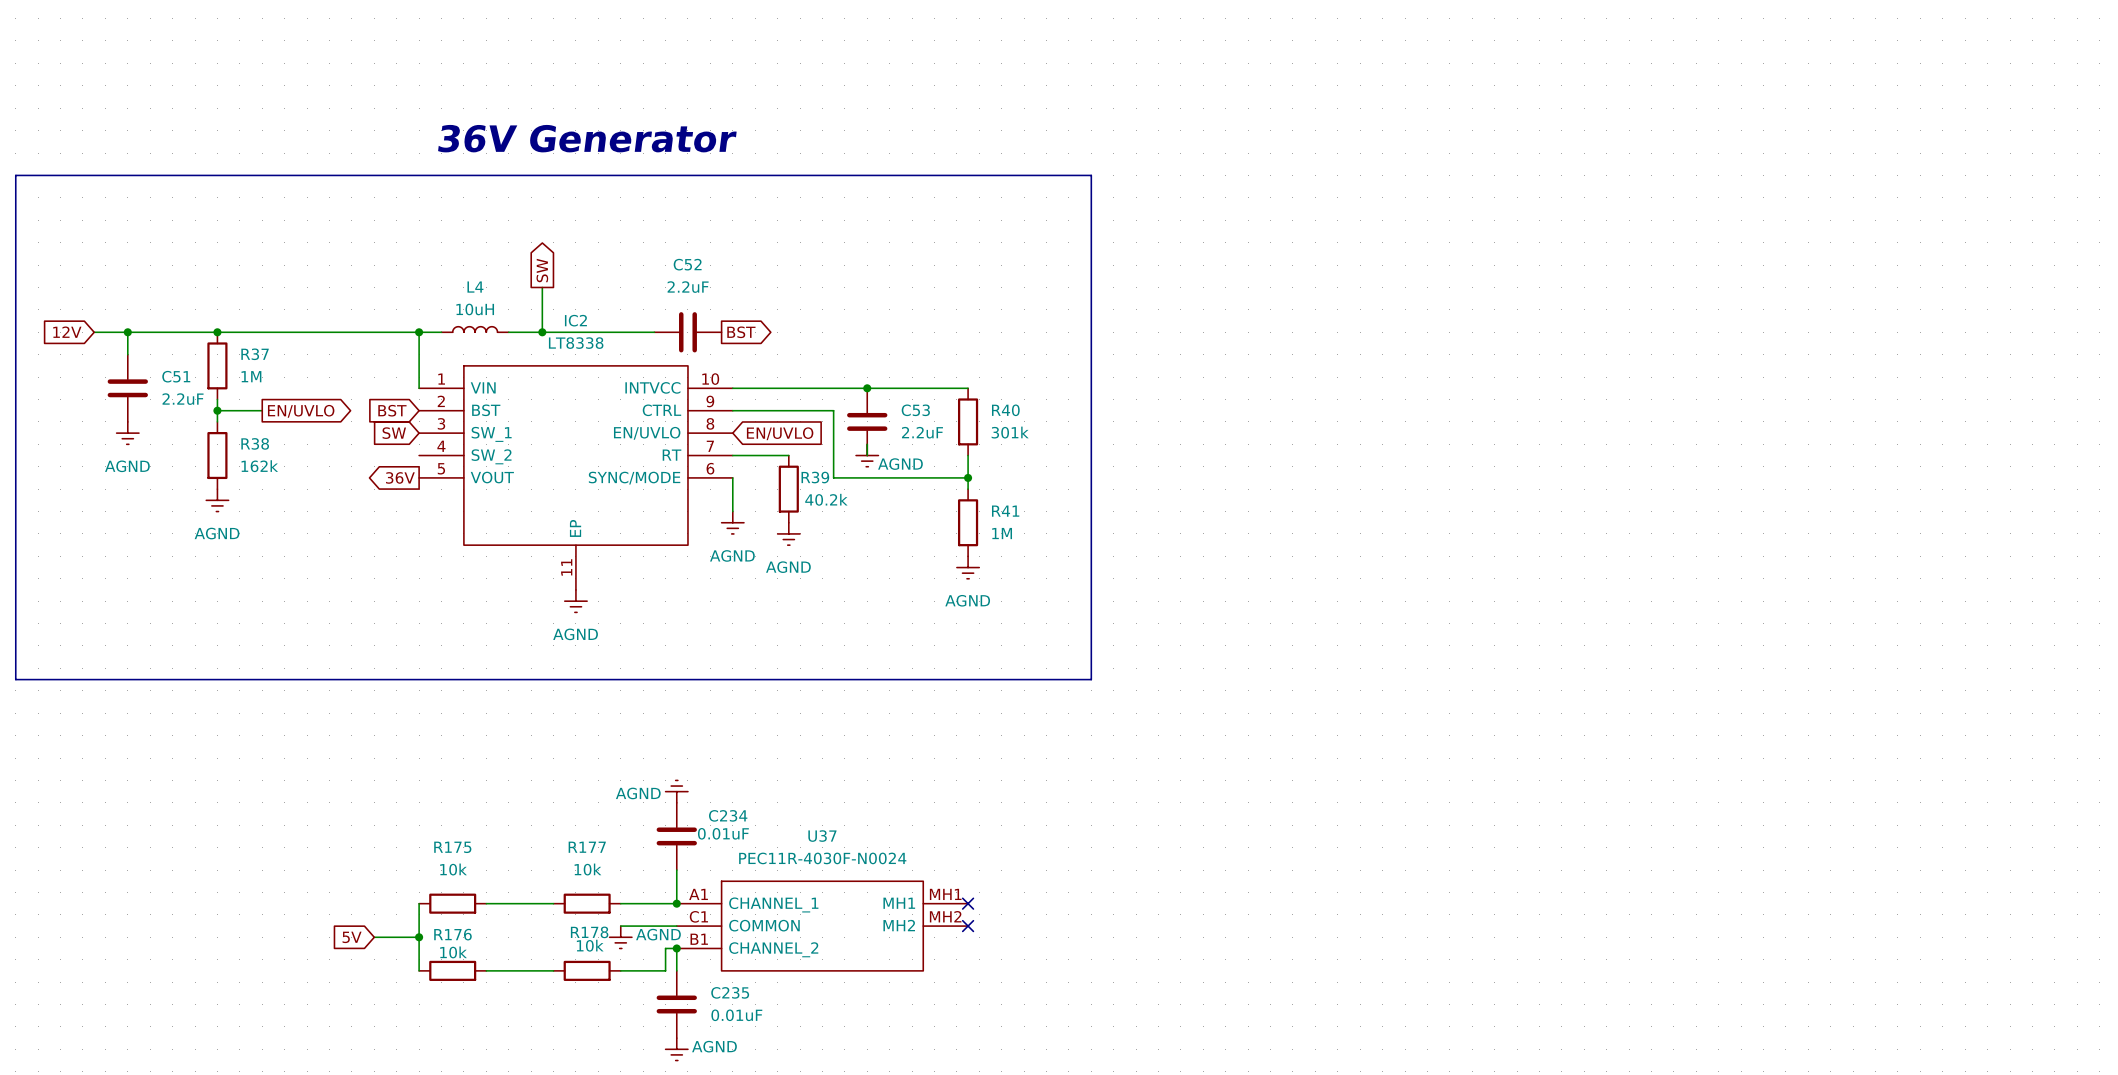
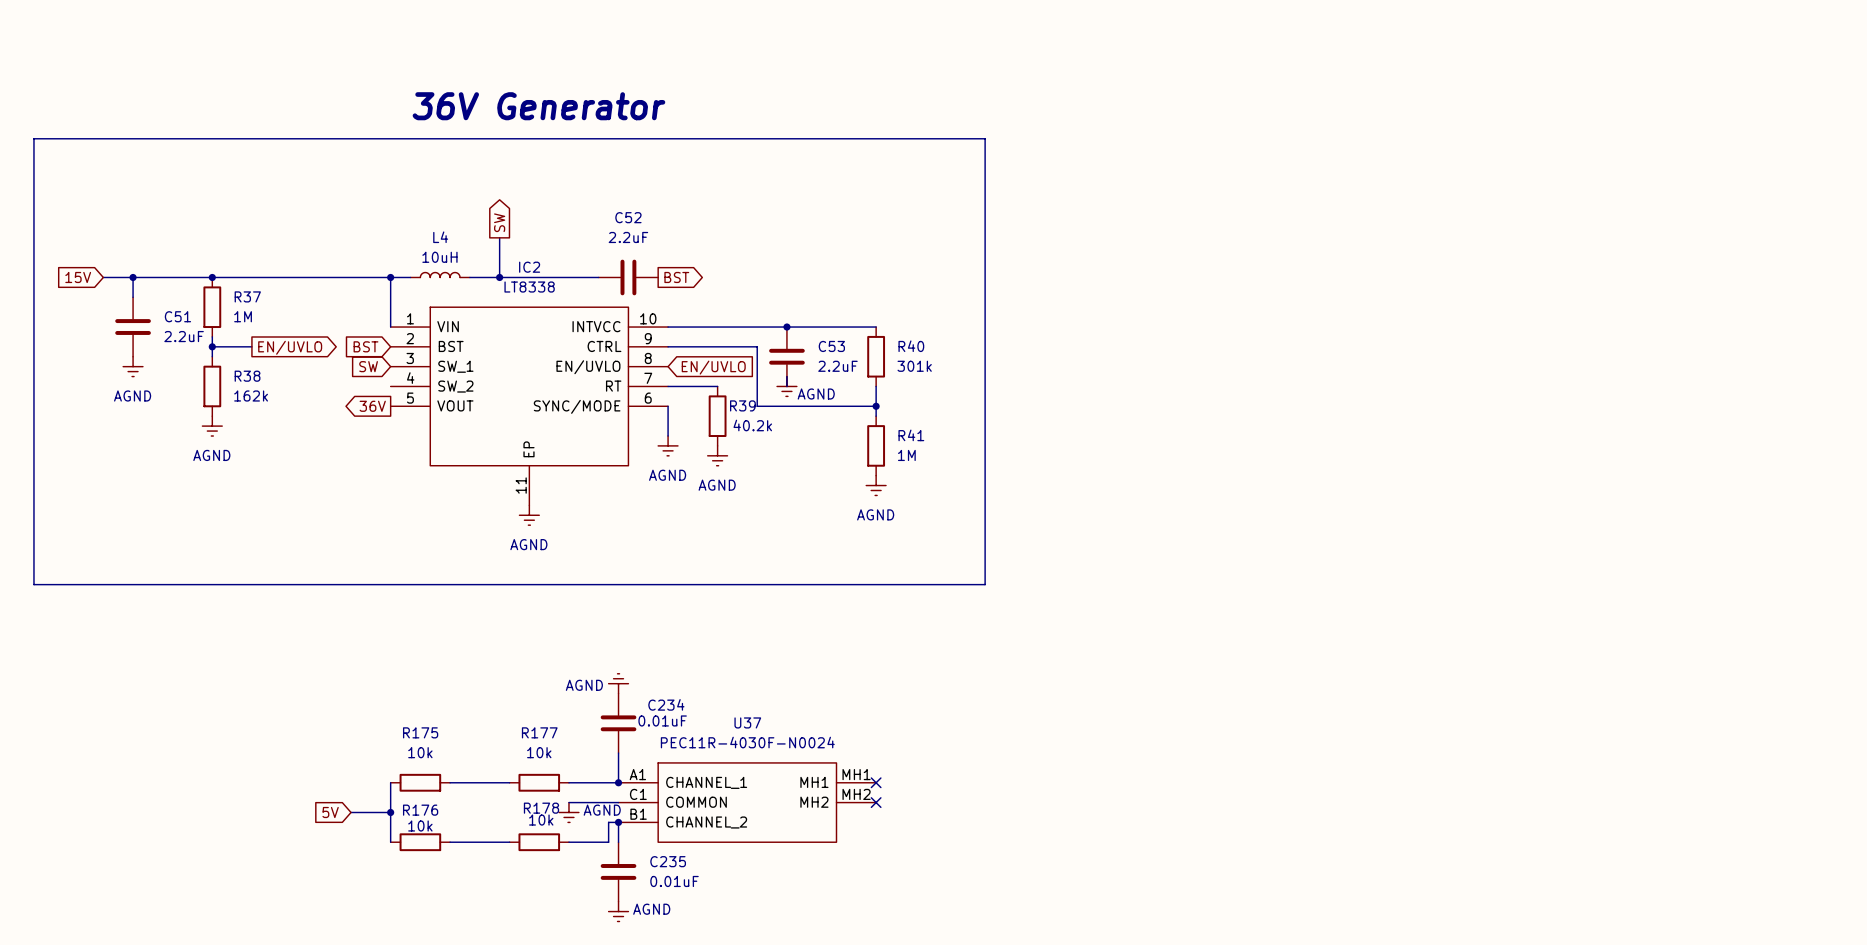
global label: 12V (67, 332) -> 15V (78, 277)

